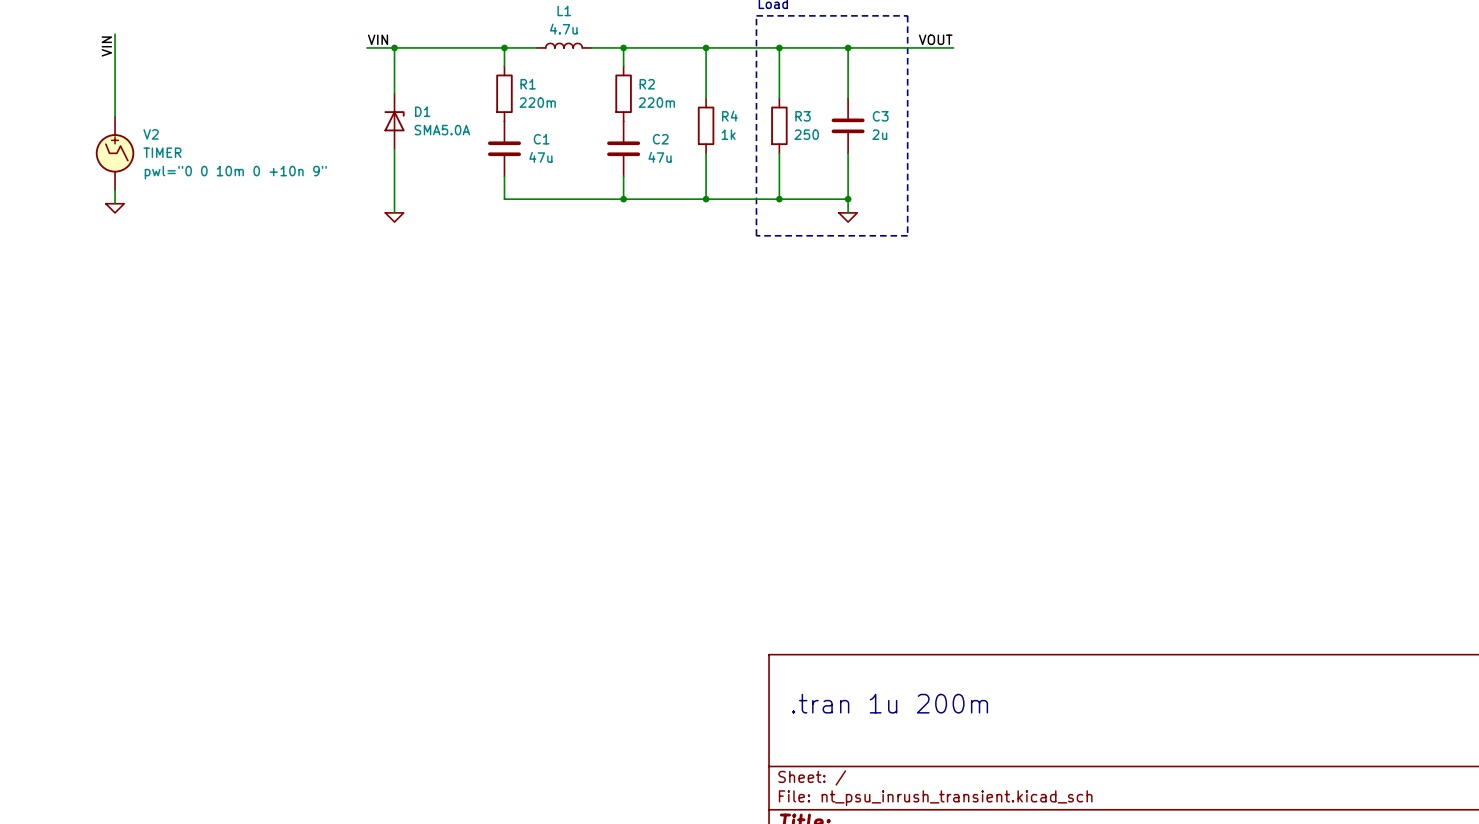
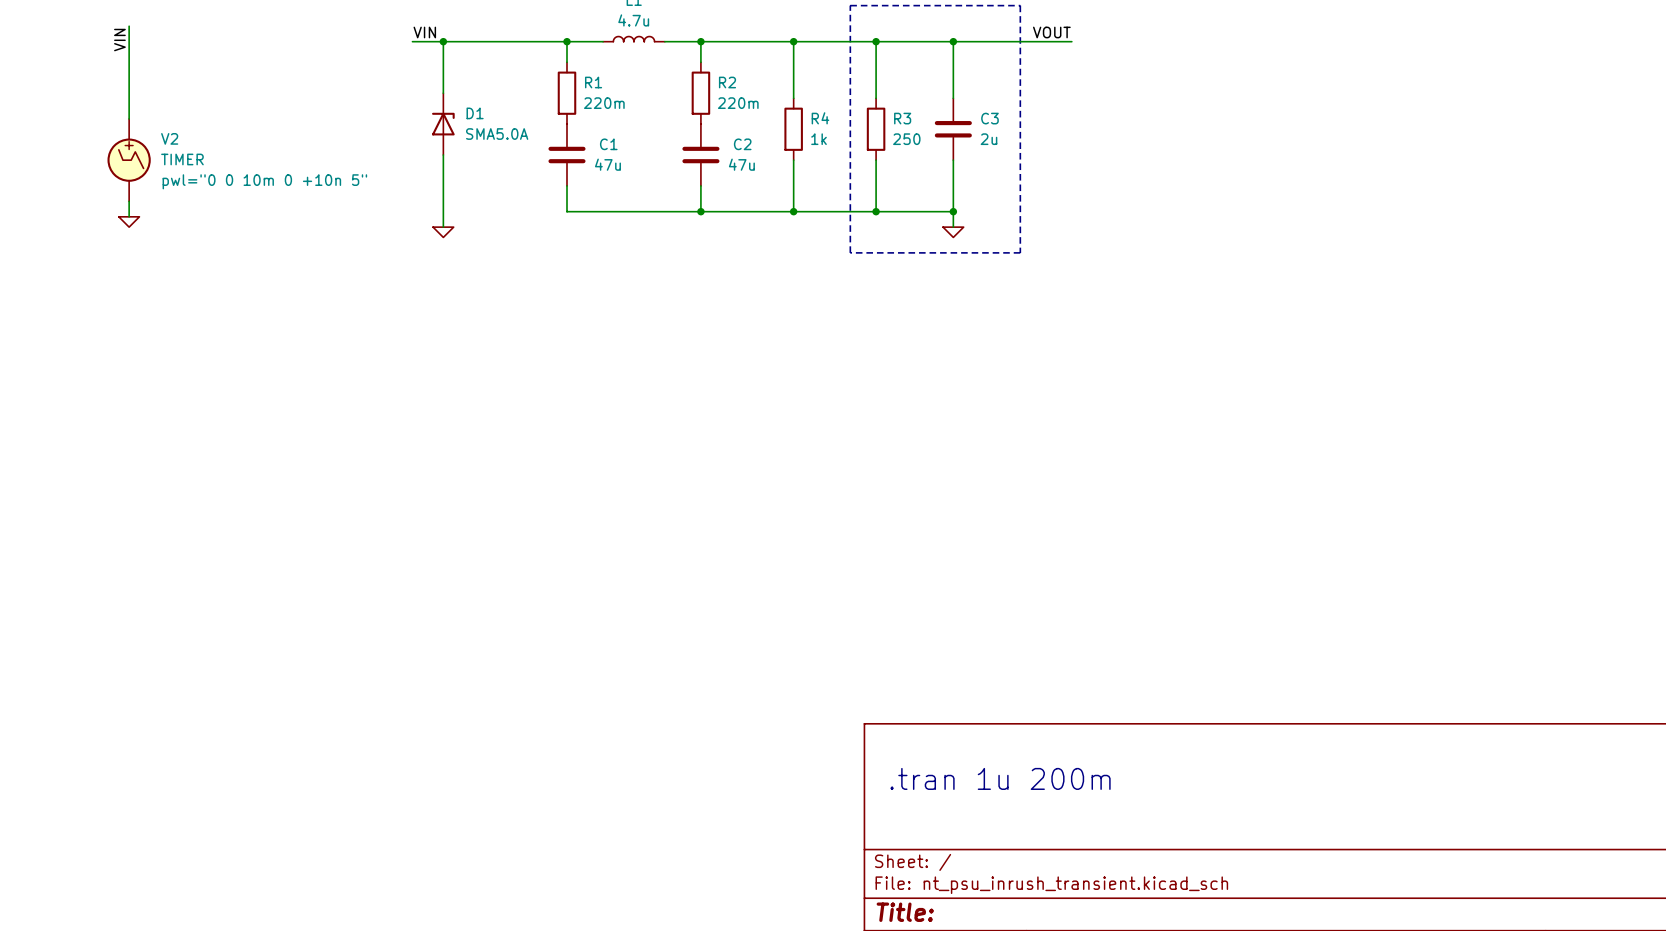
V2 text: pwl="0 0 10m 0 +10n 9" (235, 172) -> pwl="0 0 10m 0 +10n 5" (264, 181)

